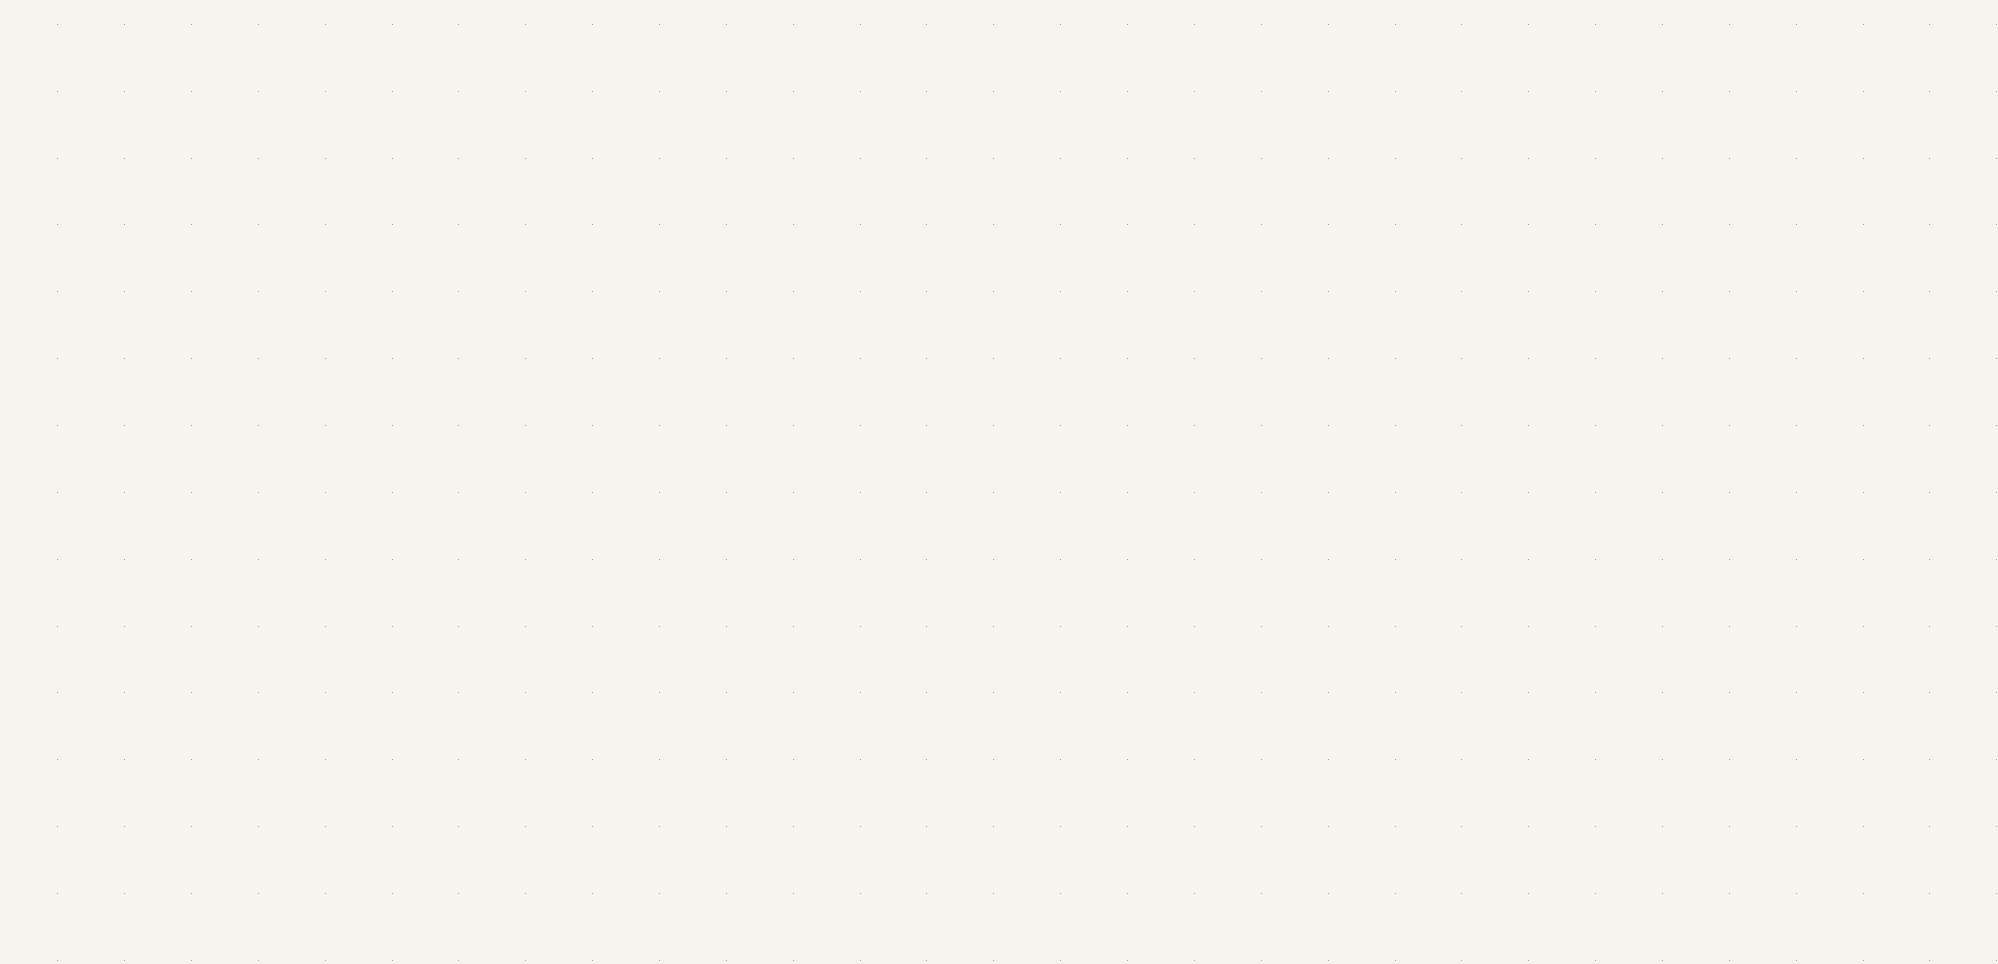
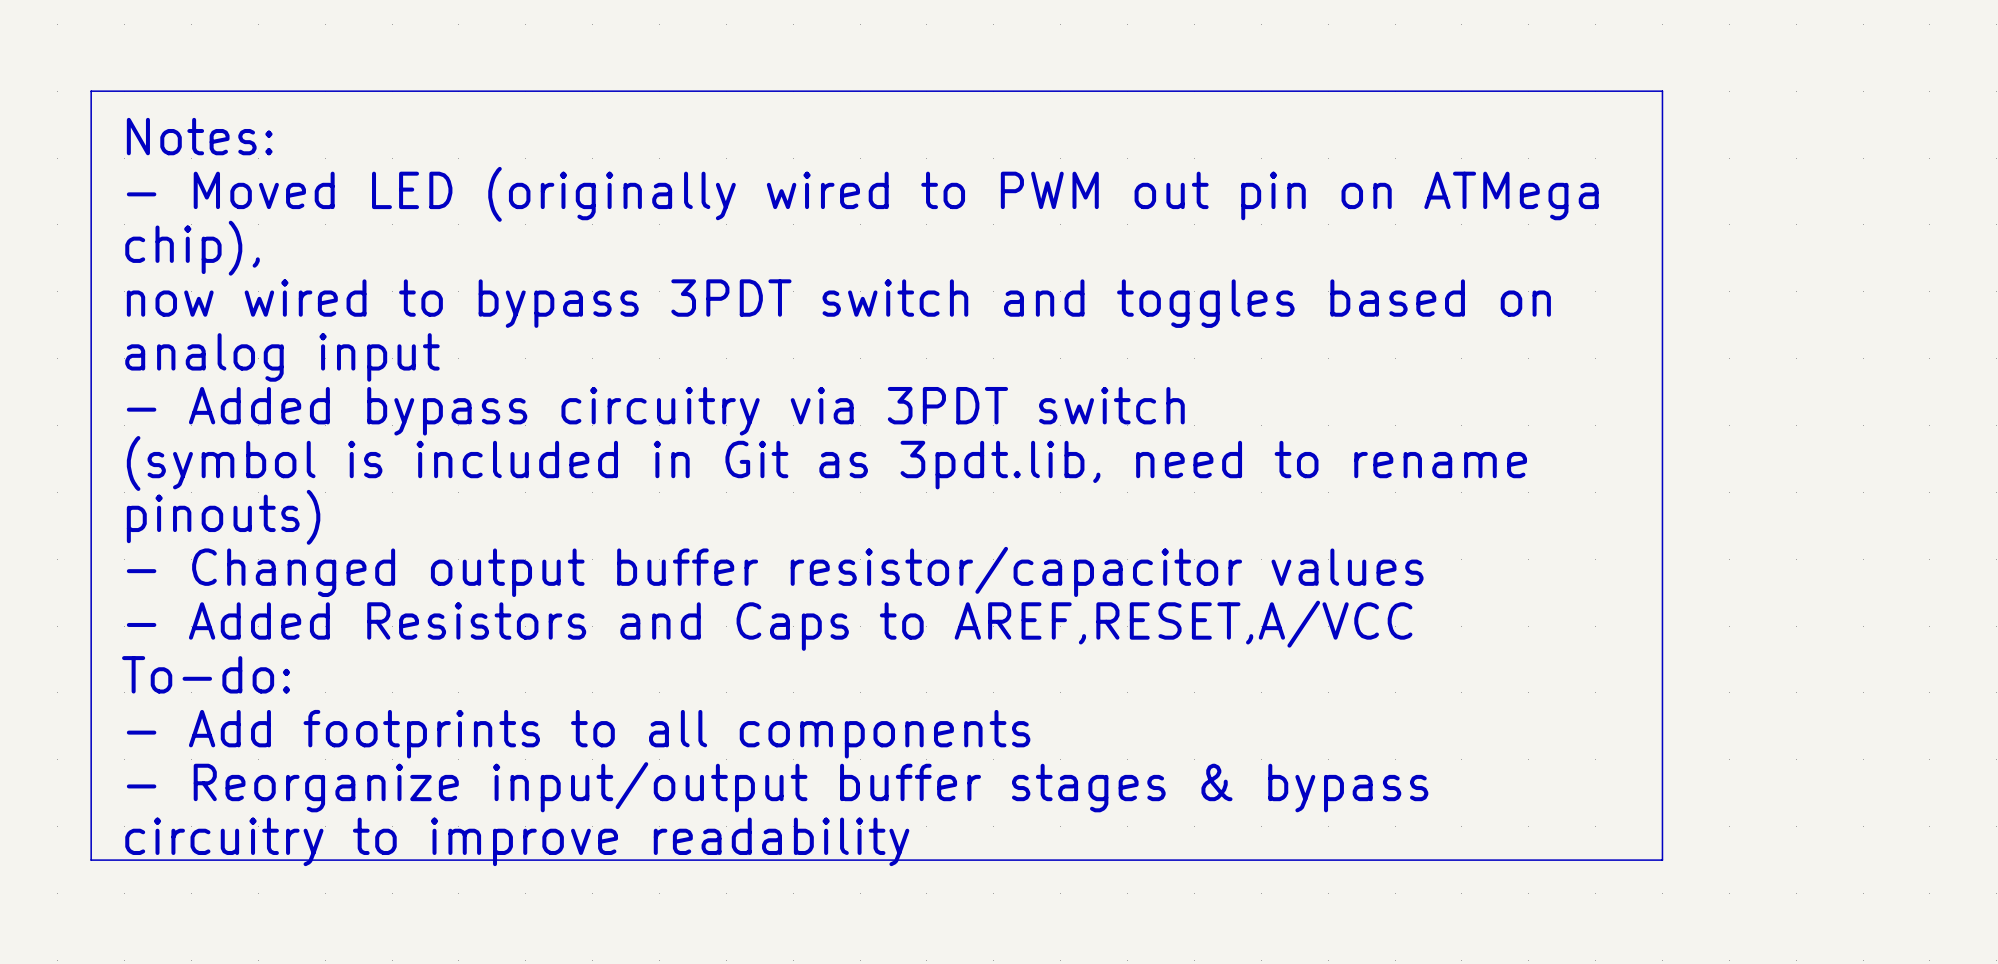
line: none -> (91, 91) (1662, 91) (1662, 860) (91, 860) (91, 91)
text: none -> Notes: (199, 136)
text: none -> - Moved LED (originally wired to PWM out pin on ATMega (862, 194)
text: none -> chip), (192, 248)
text: none -> now wired to bypass 3PDT switch and toggles based on (838, 303)
text: none -> analog input (282, 357)
text: none -> - Added bypass circuitry via 3PDT switch (655, 411)
text: none -> (symbol is included in Git as 3pdt.lib, need to rename (826, 463)
text: none -> pinouts) (223, 517)
text: none -> - Changed output buffer resistor/capacitor values (775, 571)
text: none -> - Added Resistors and Caps to AREF,RESET,A/VCC (769, 625)
text: none -> To-do: (206, 674)
text: none -> - Add footprints to all components (578, 734)
text: none -> - Reorganize input/output buffer stages & bypass (777, 787)
text: none -> circuitry to improve readability (517, 841)

